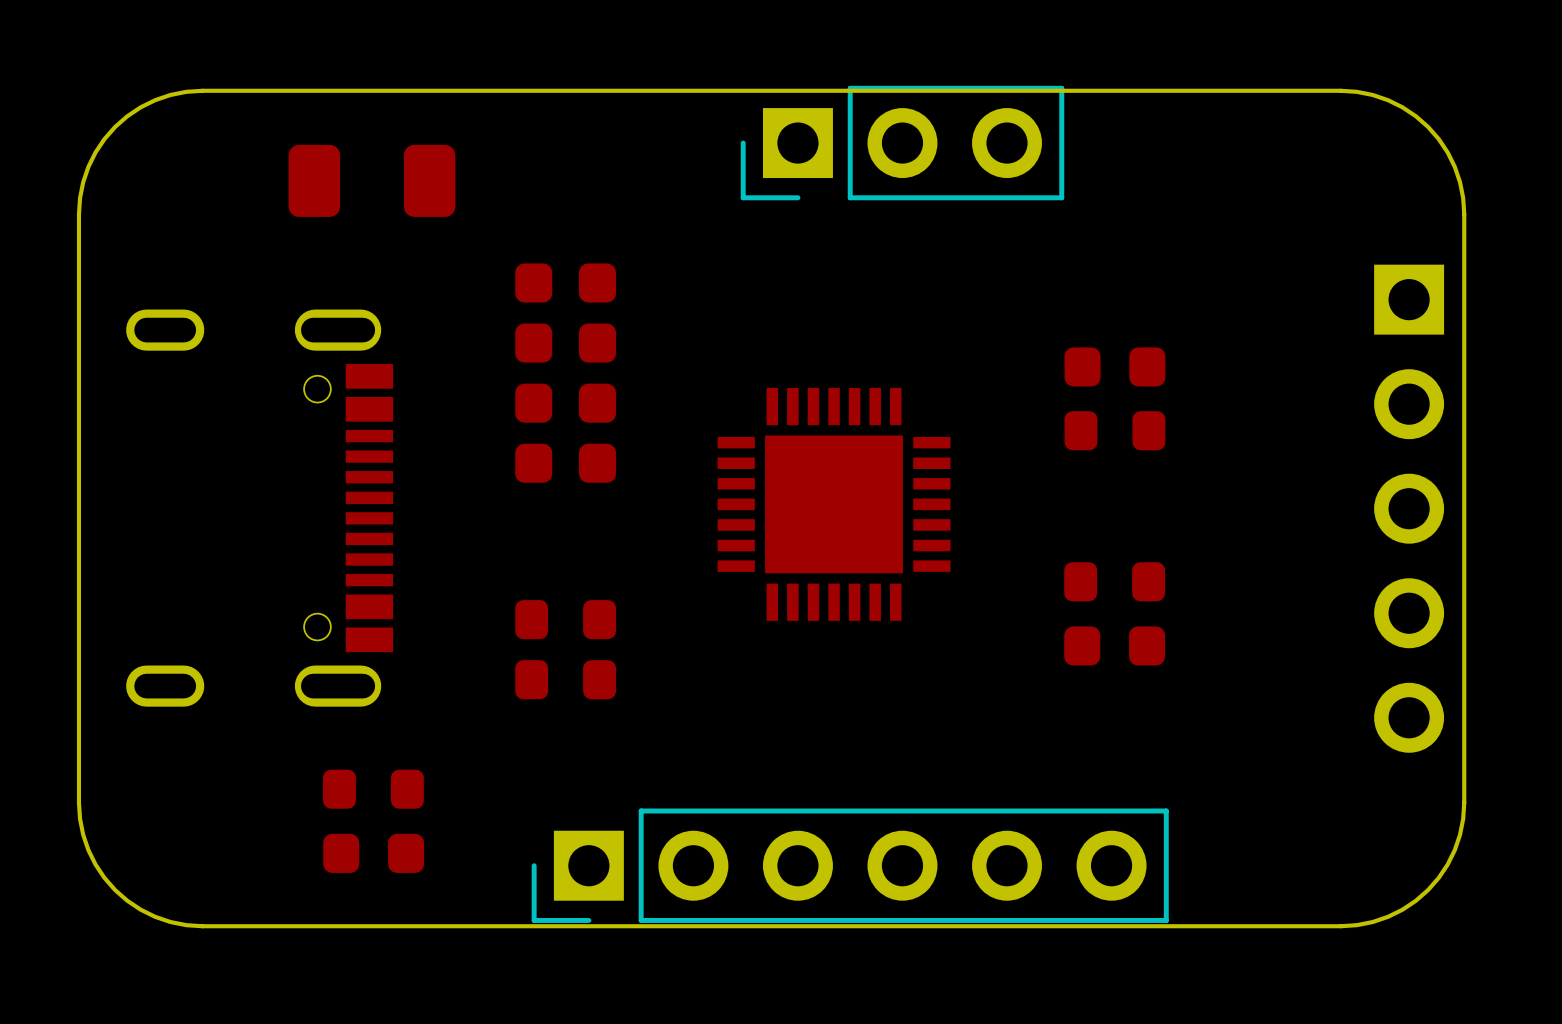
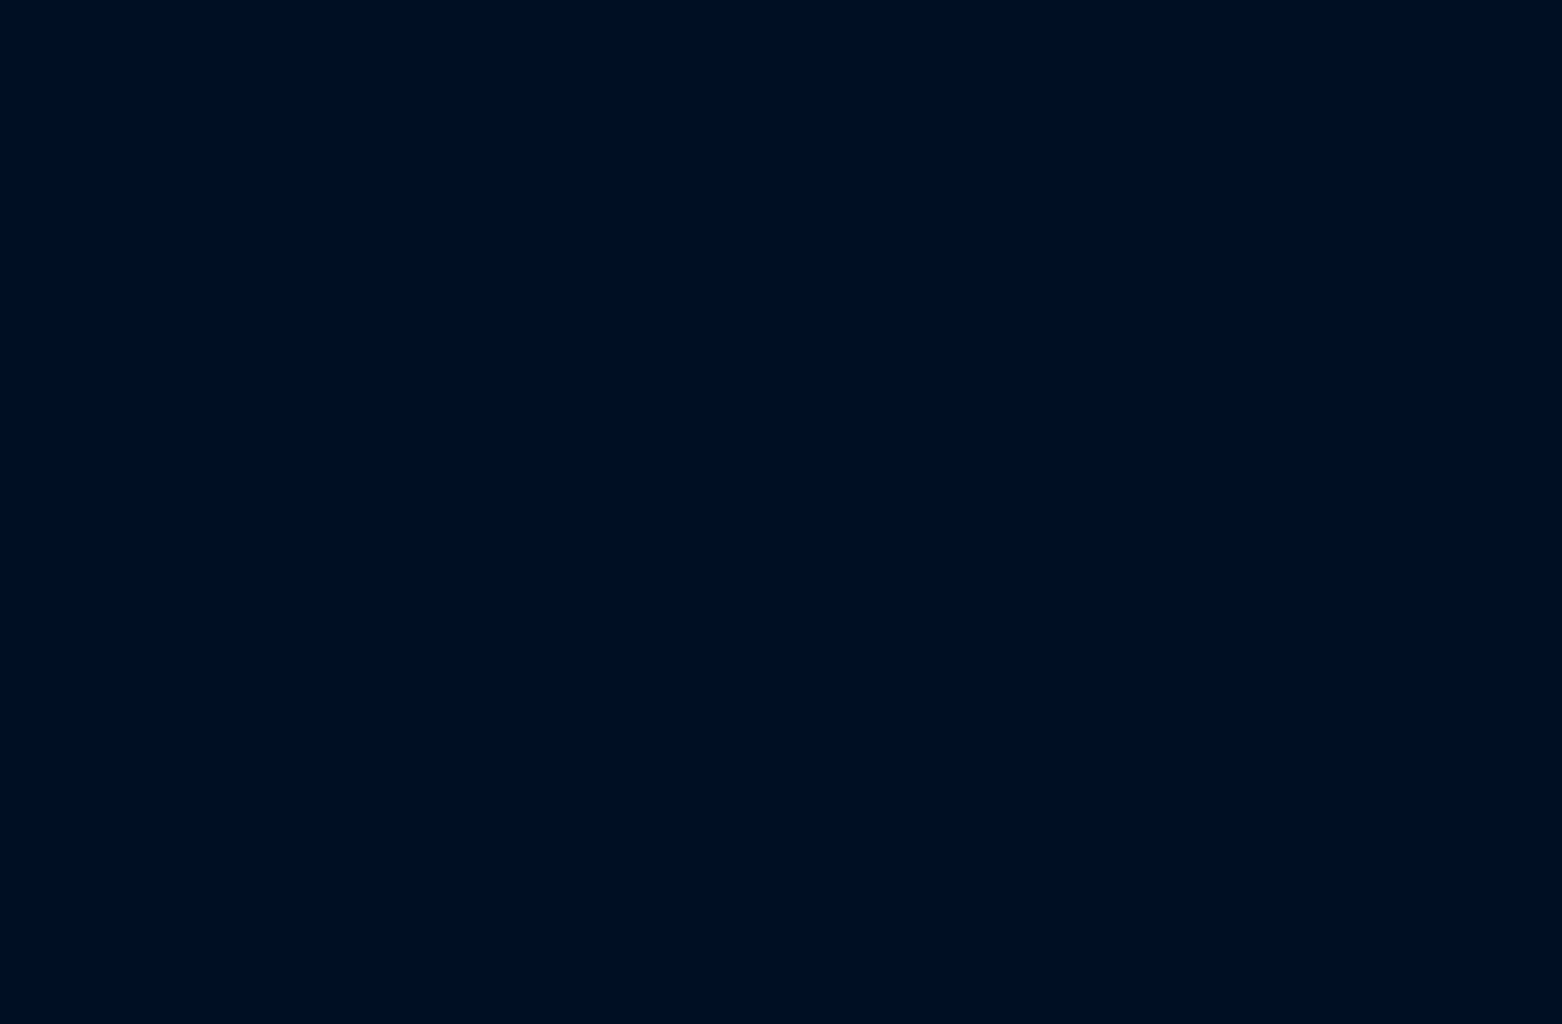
board edge: (1340, 90) (202, 90) (170, 94) (140, 107) (115, 126) (95, 152) (83, 182) (78, 214) (78, 802) (83, 834) (95, 864) (115, 890) (140, 909) (170, 922) (202, 926) (1340, 926) (1372, 922) (1402, 909) (1428, 890) (1438, 877) (1454, 850) (1463, 818) (1463, 198) (1454, 166) (1447, 152) (1438, 139) (1415, 116) (1388, 100) (1372, 94) (1340, 90) -> none
part: (902, 143) -> none
part: (372, 180) -> none
part: (565, 282) -> none
part: (565, 343) -> none
part: (1114, 366) -> none
part: (565, 403) -> none
part: (1114, 430) -> none
part: (565, 463) -> none
part: (834, 504) -> none
part: (259, 508) -> none
part: (1409, 508) -> none
part: (1114, 581) -> none
part: (565, 619) -> none
part: (1114, 645) -> none
part: (565, 679) -> none
part: (373, 789) -> none
part: (373, 853) -> none
part: (850, 865) -> none

